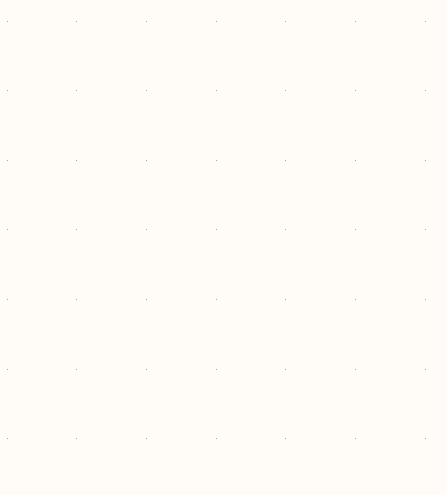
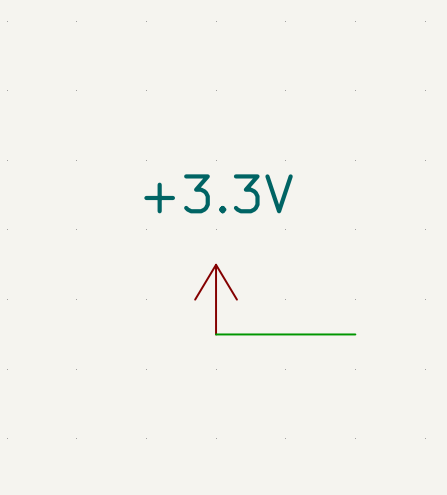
power symbol: none -> +3.3V (216, 299)
wire: none -> (216, 334) (355, 334)

